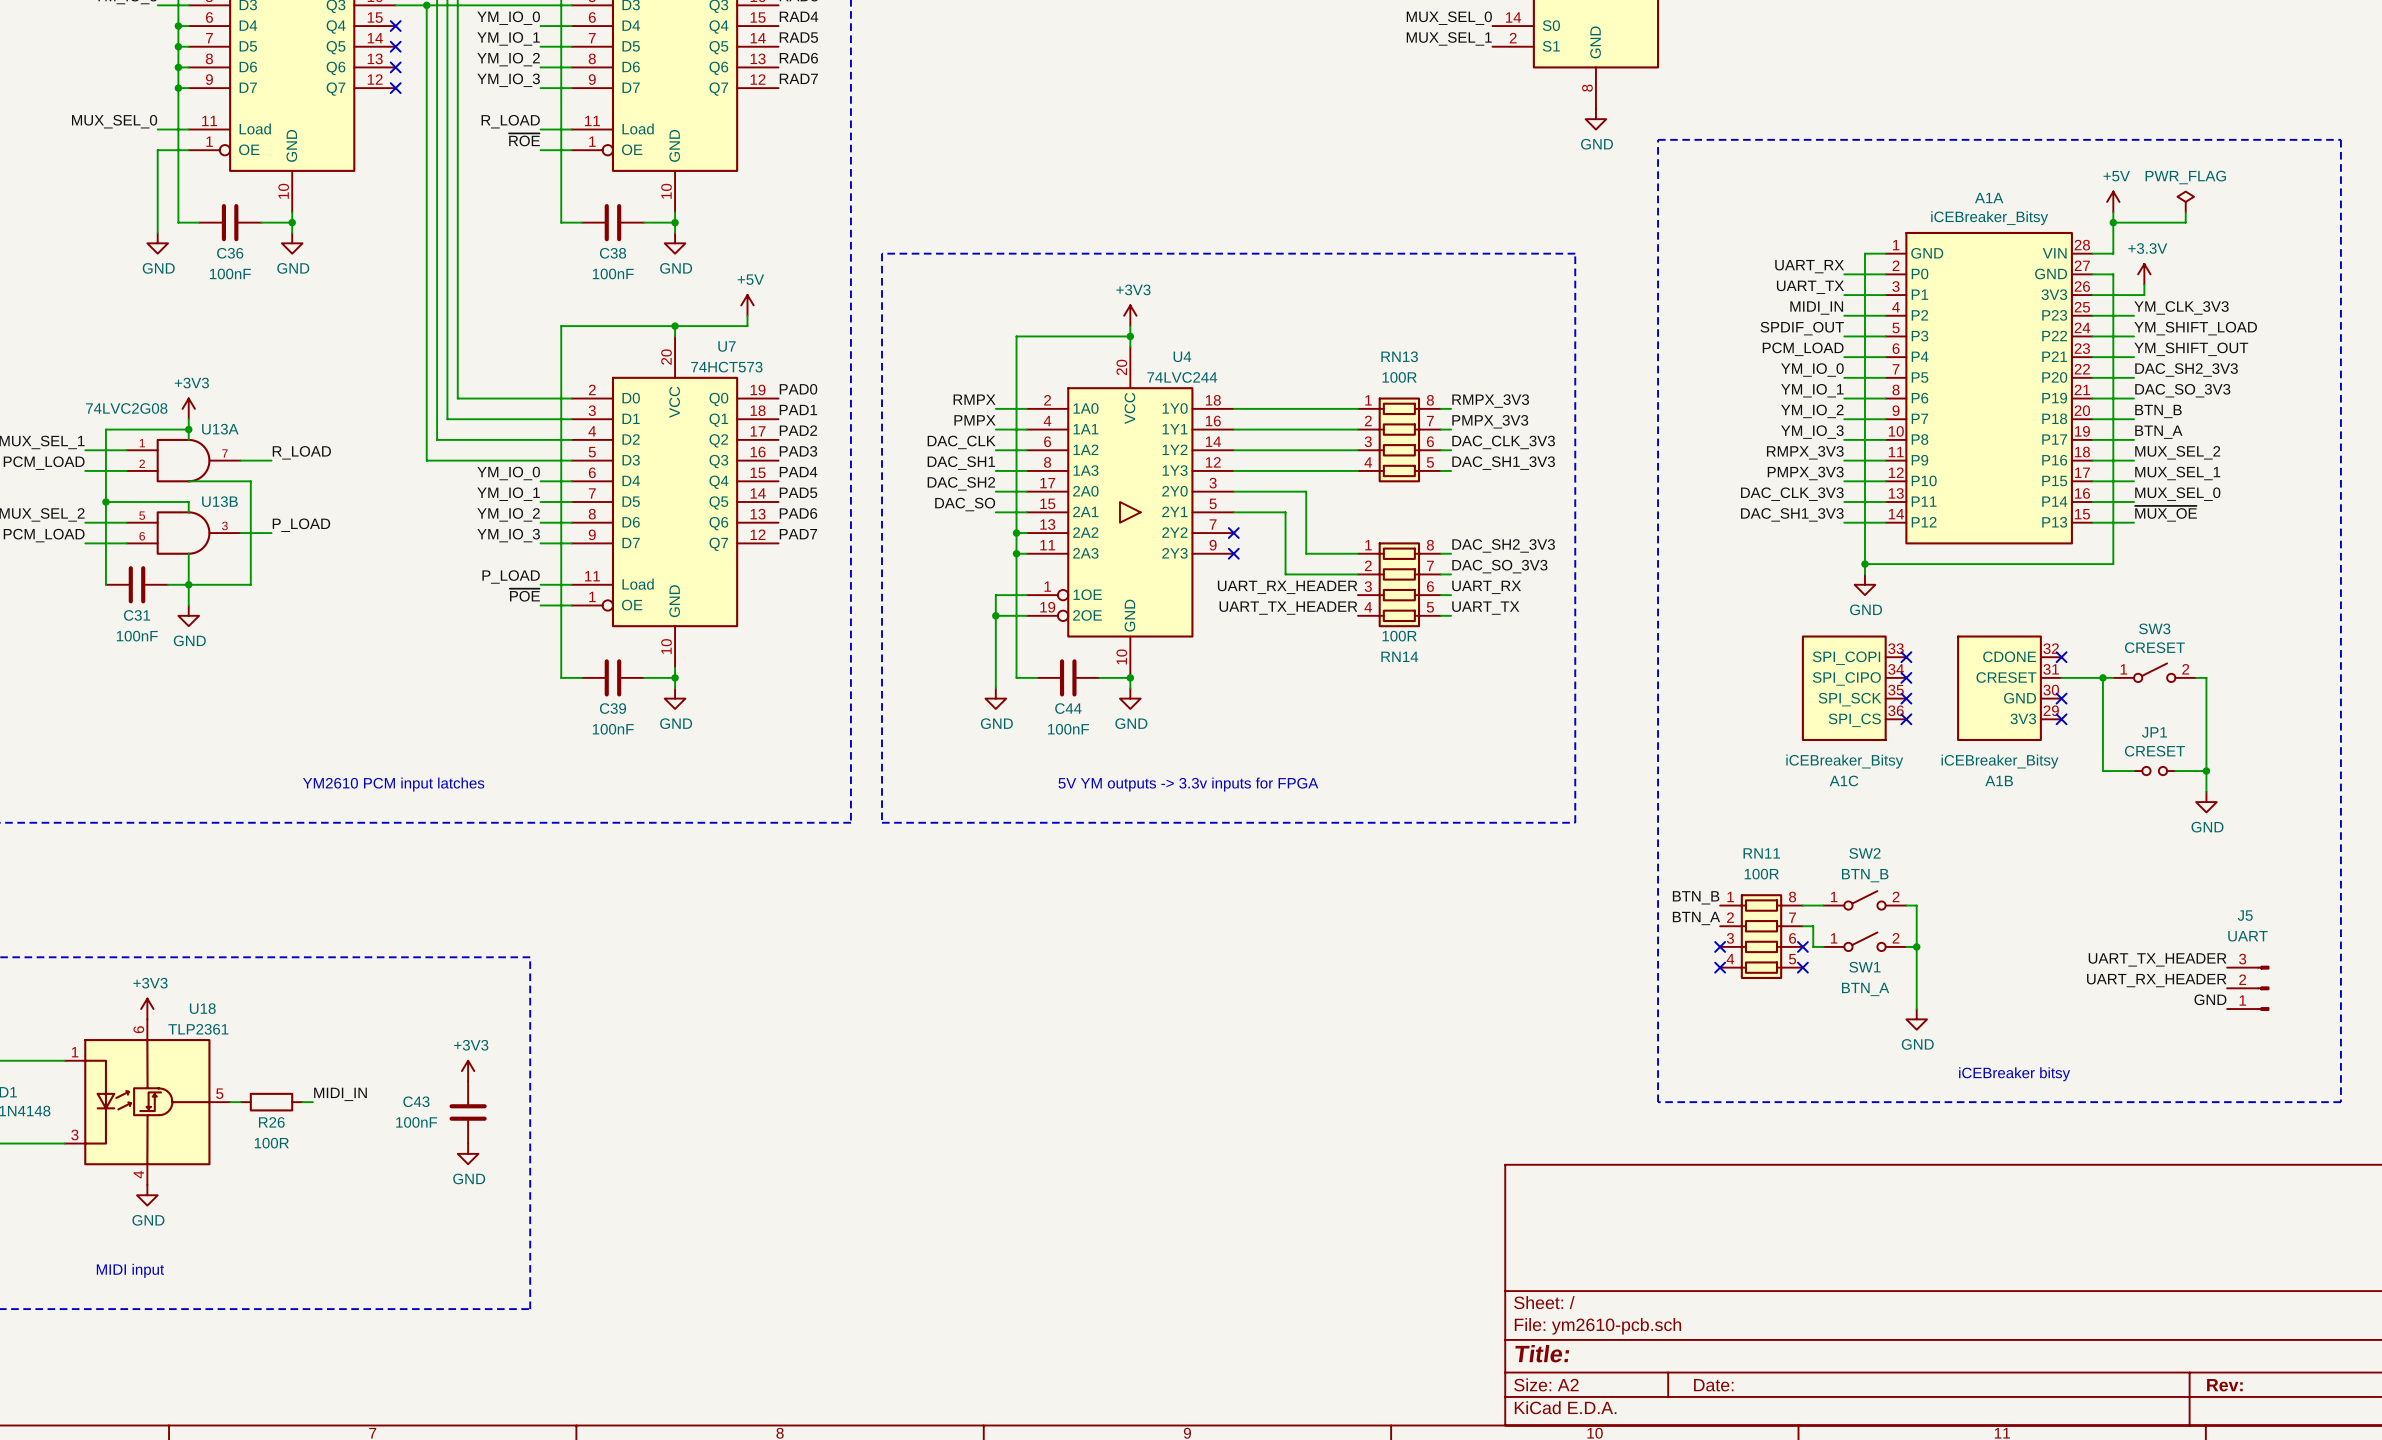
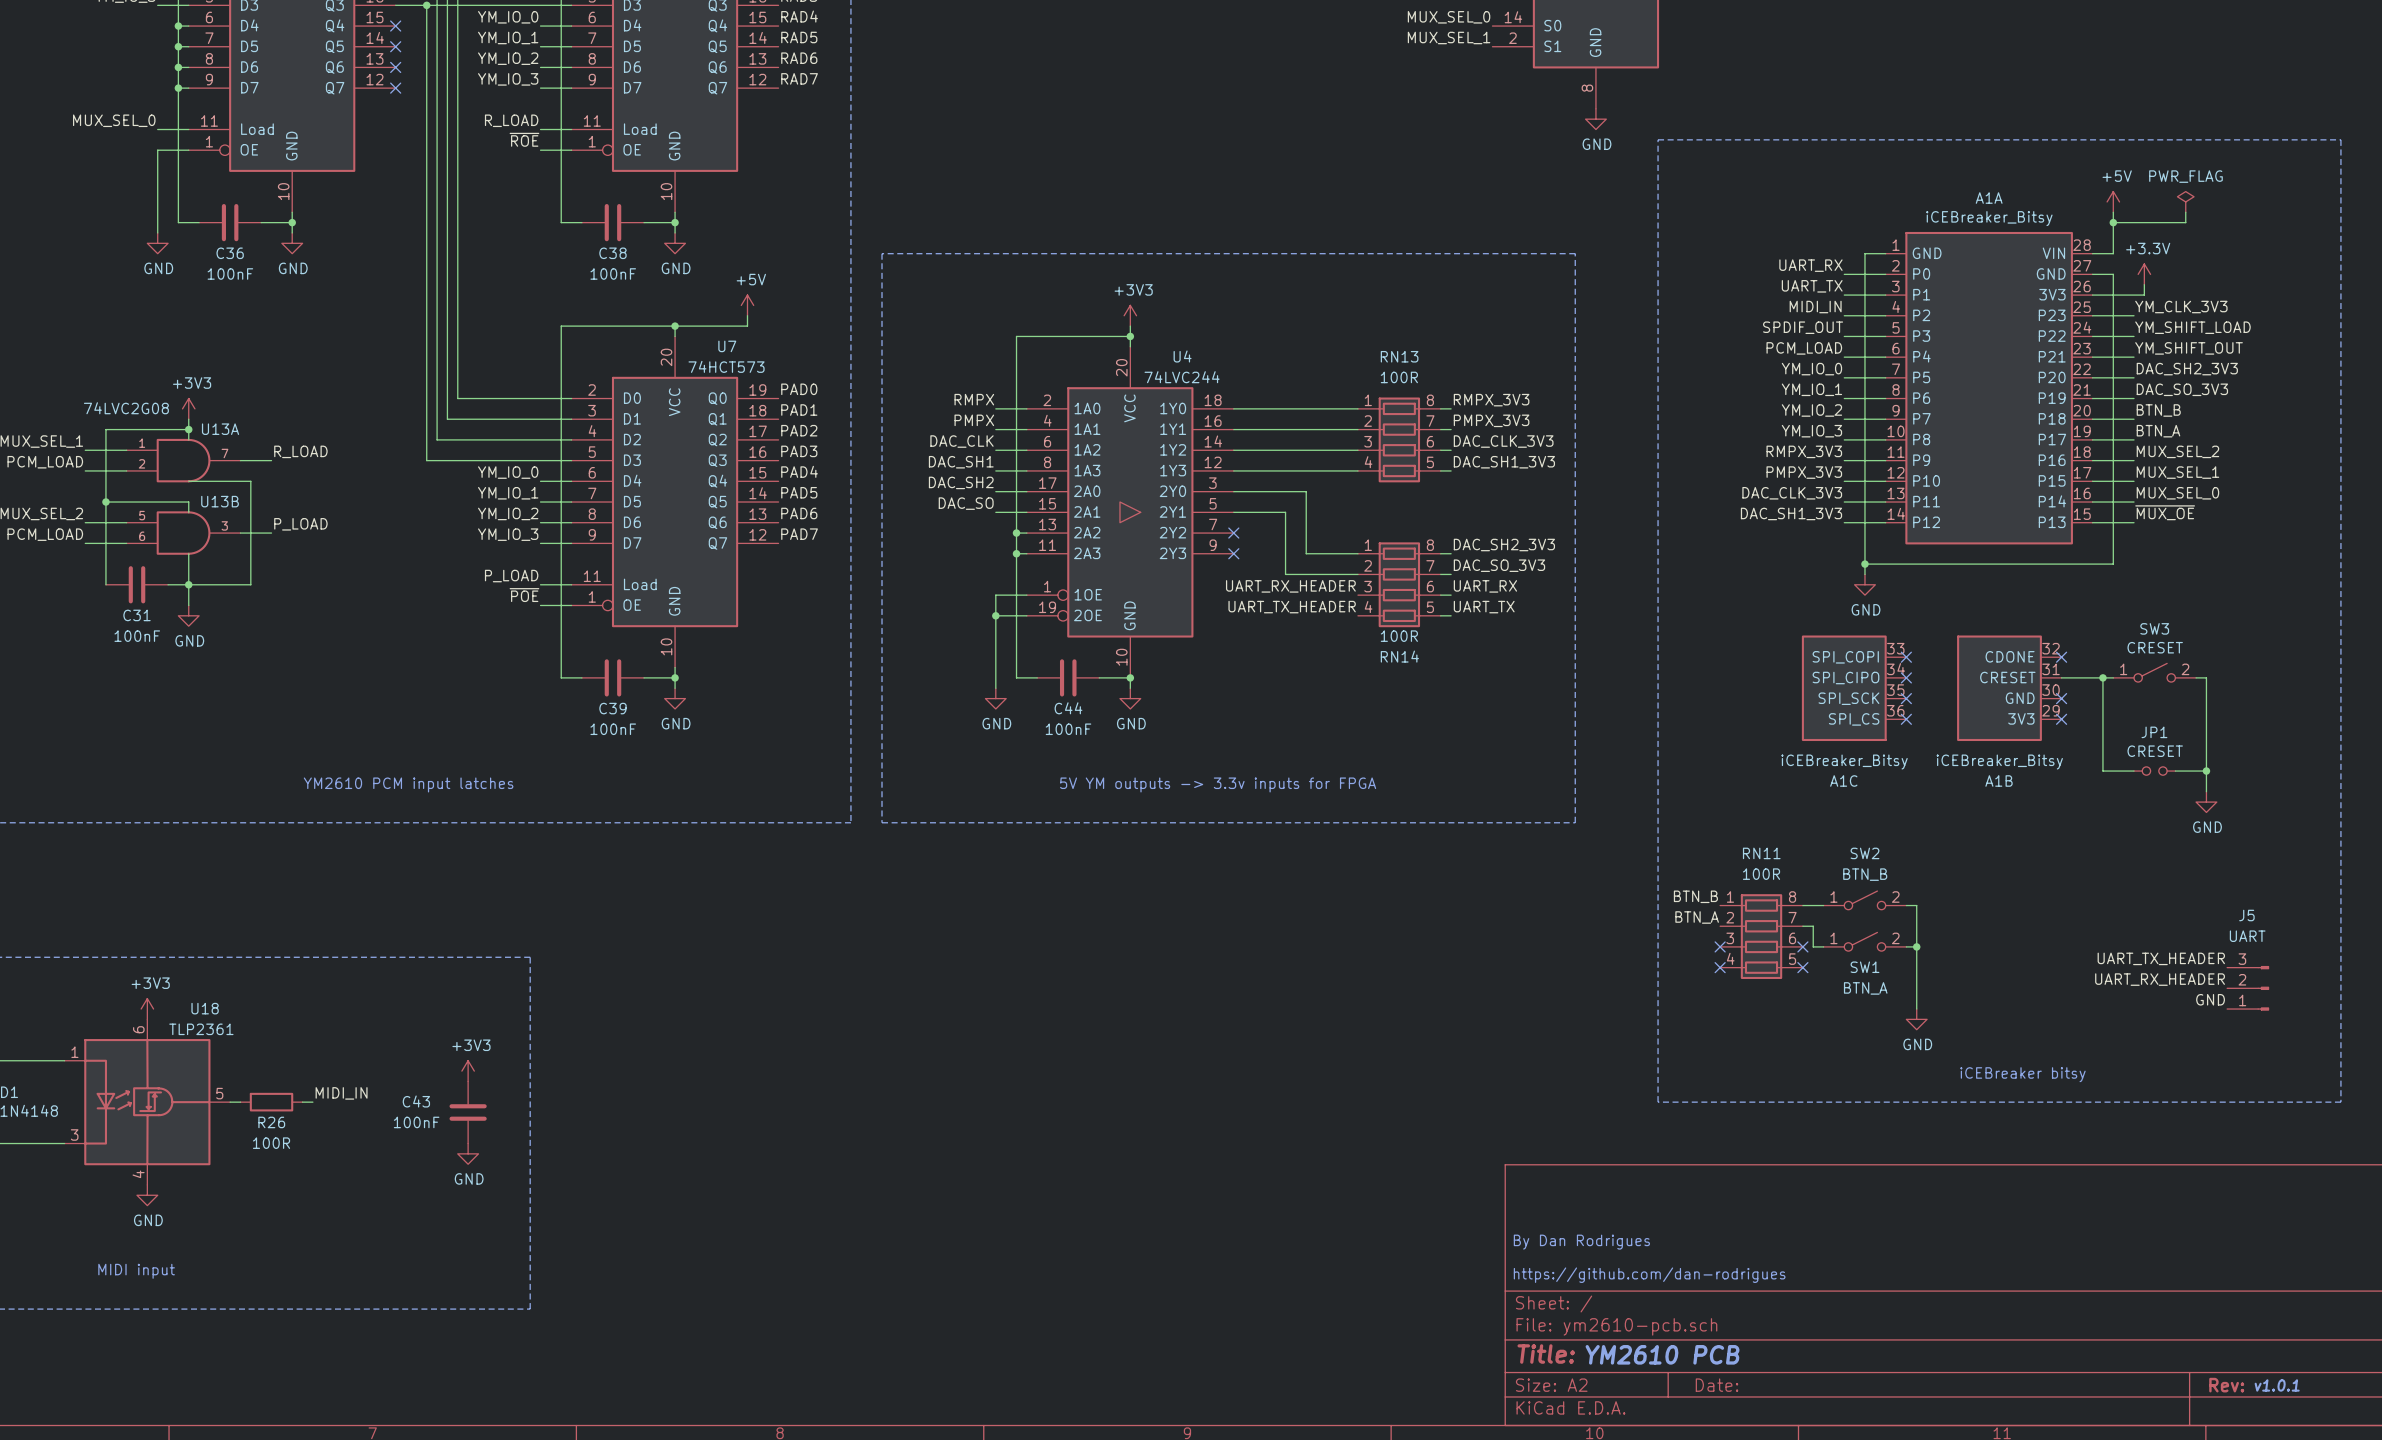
text: none -> By Dan Rodrigues (1581, 1242)
text: none -> https://github.com/dan-rodrigues (1649, 1275)
text: none -> YM2610 PCB (1662, 1354)
text: none -> v1.0.1 (2277, 1385)

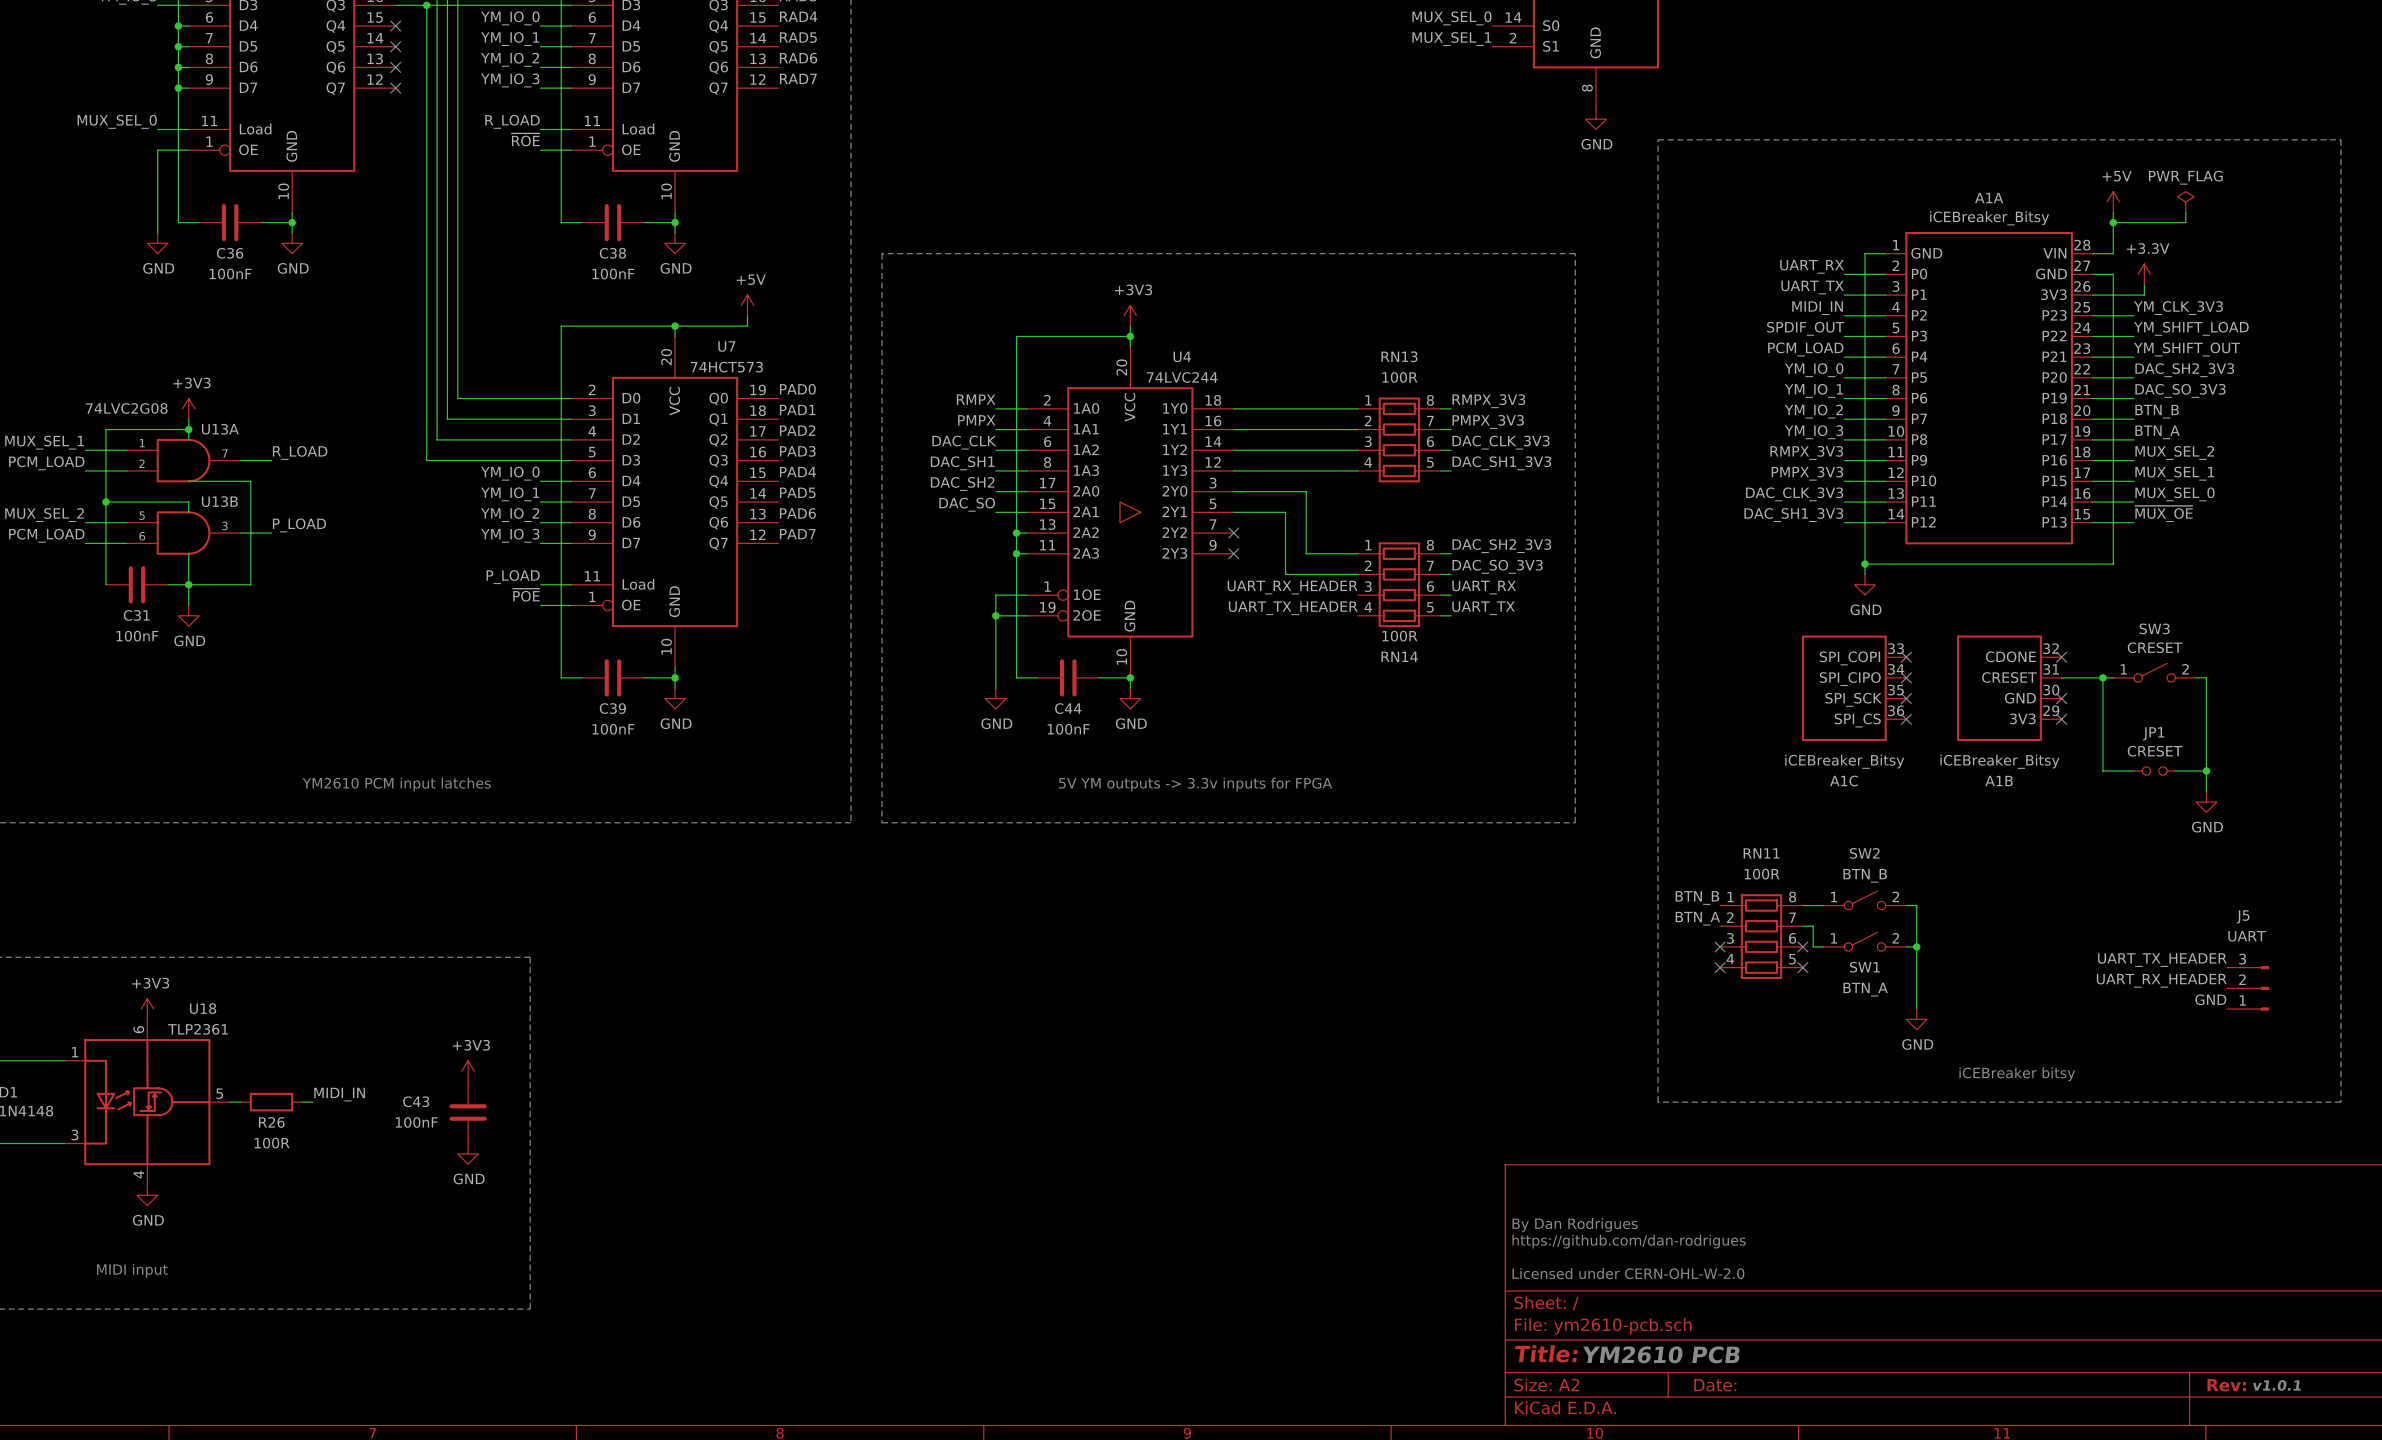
text: none -> By Dan Rodrigues (1575, 1224)
text: By Dan Rodrigues (1581, 1242) -> https://github.com/dan-rodrigues (1629, 1241)
text: https://github.com/dan-rodrigues (1649, 1275) -> Licensed under CERN-OHL-W-2.0 (1628, 1273)

